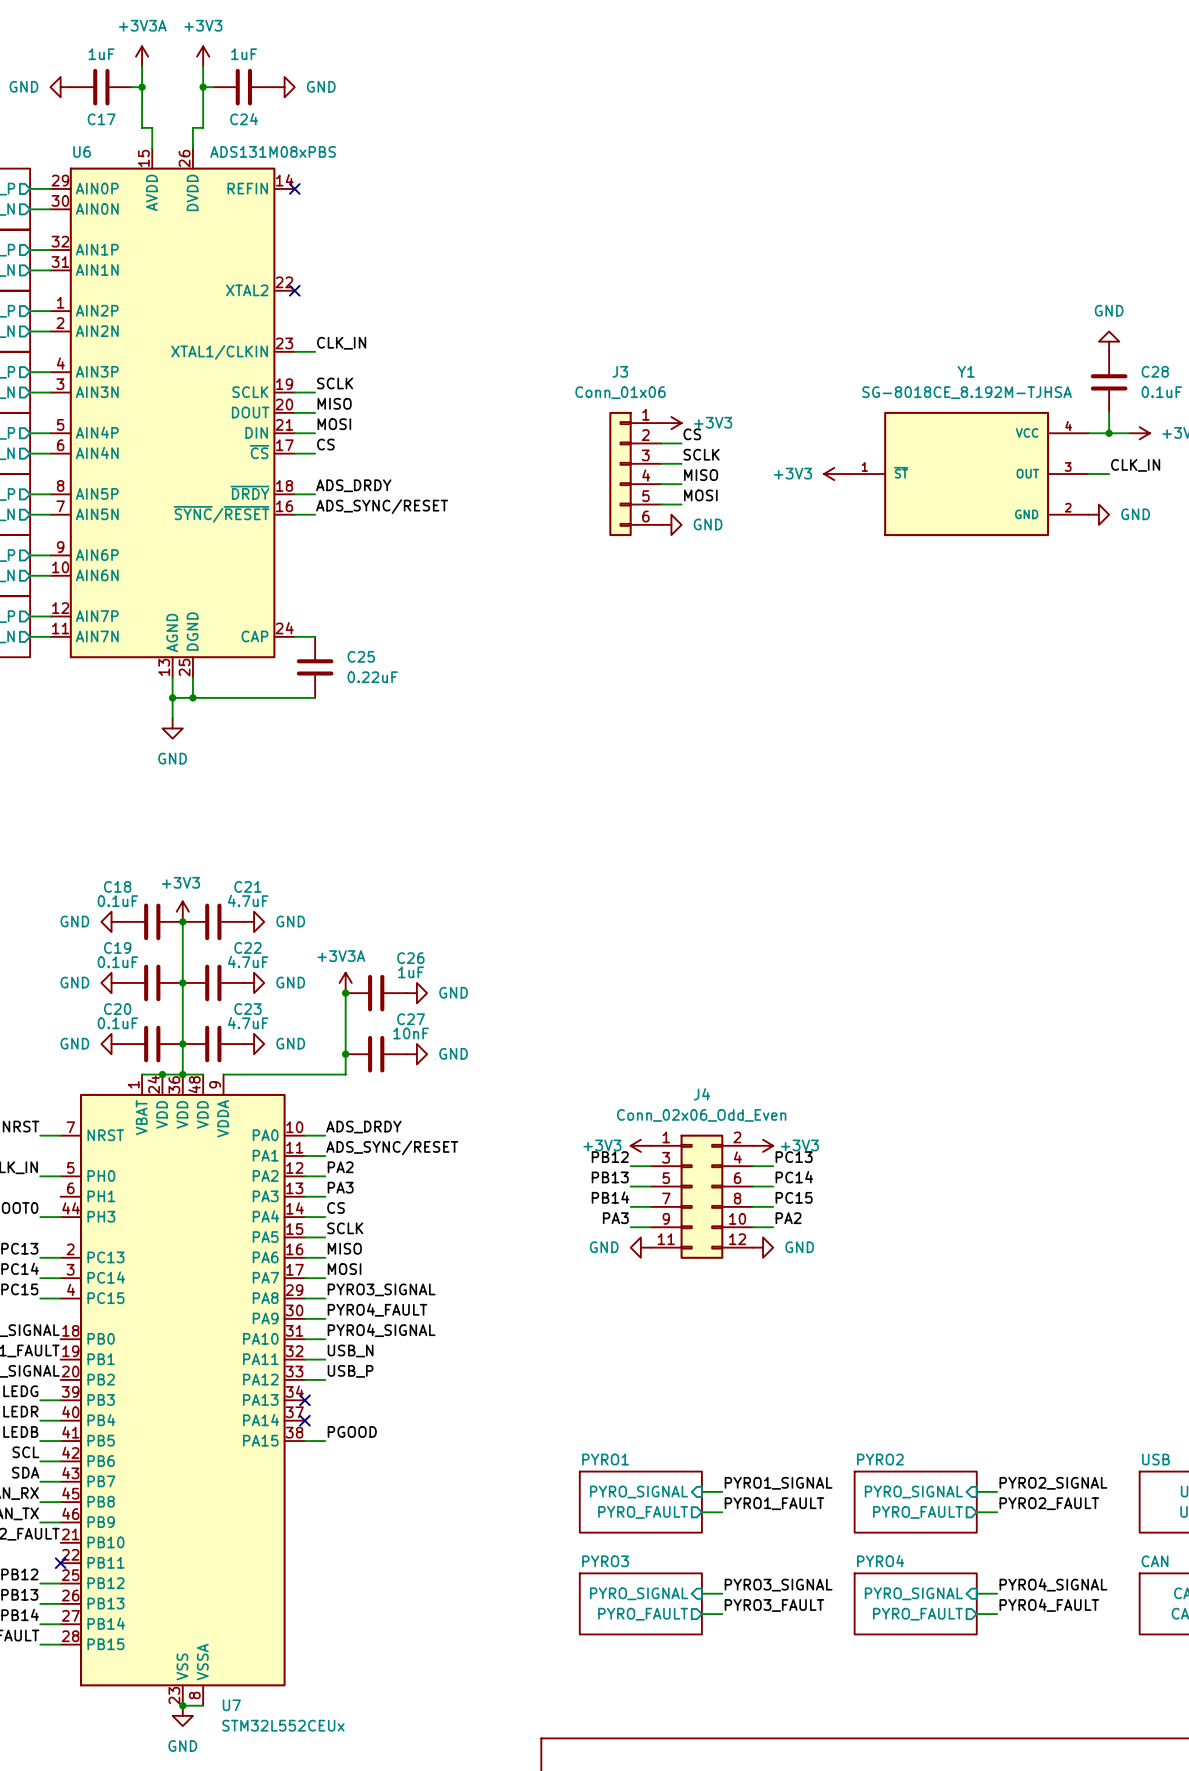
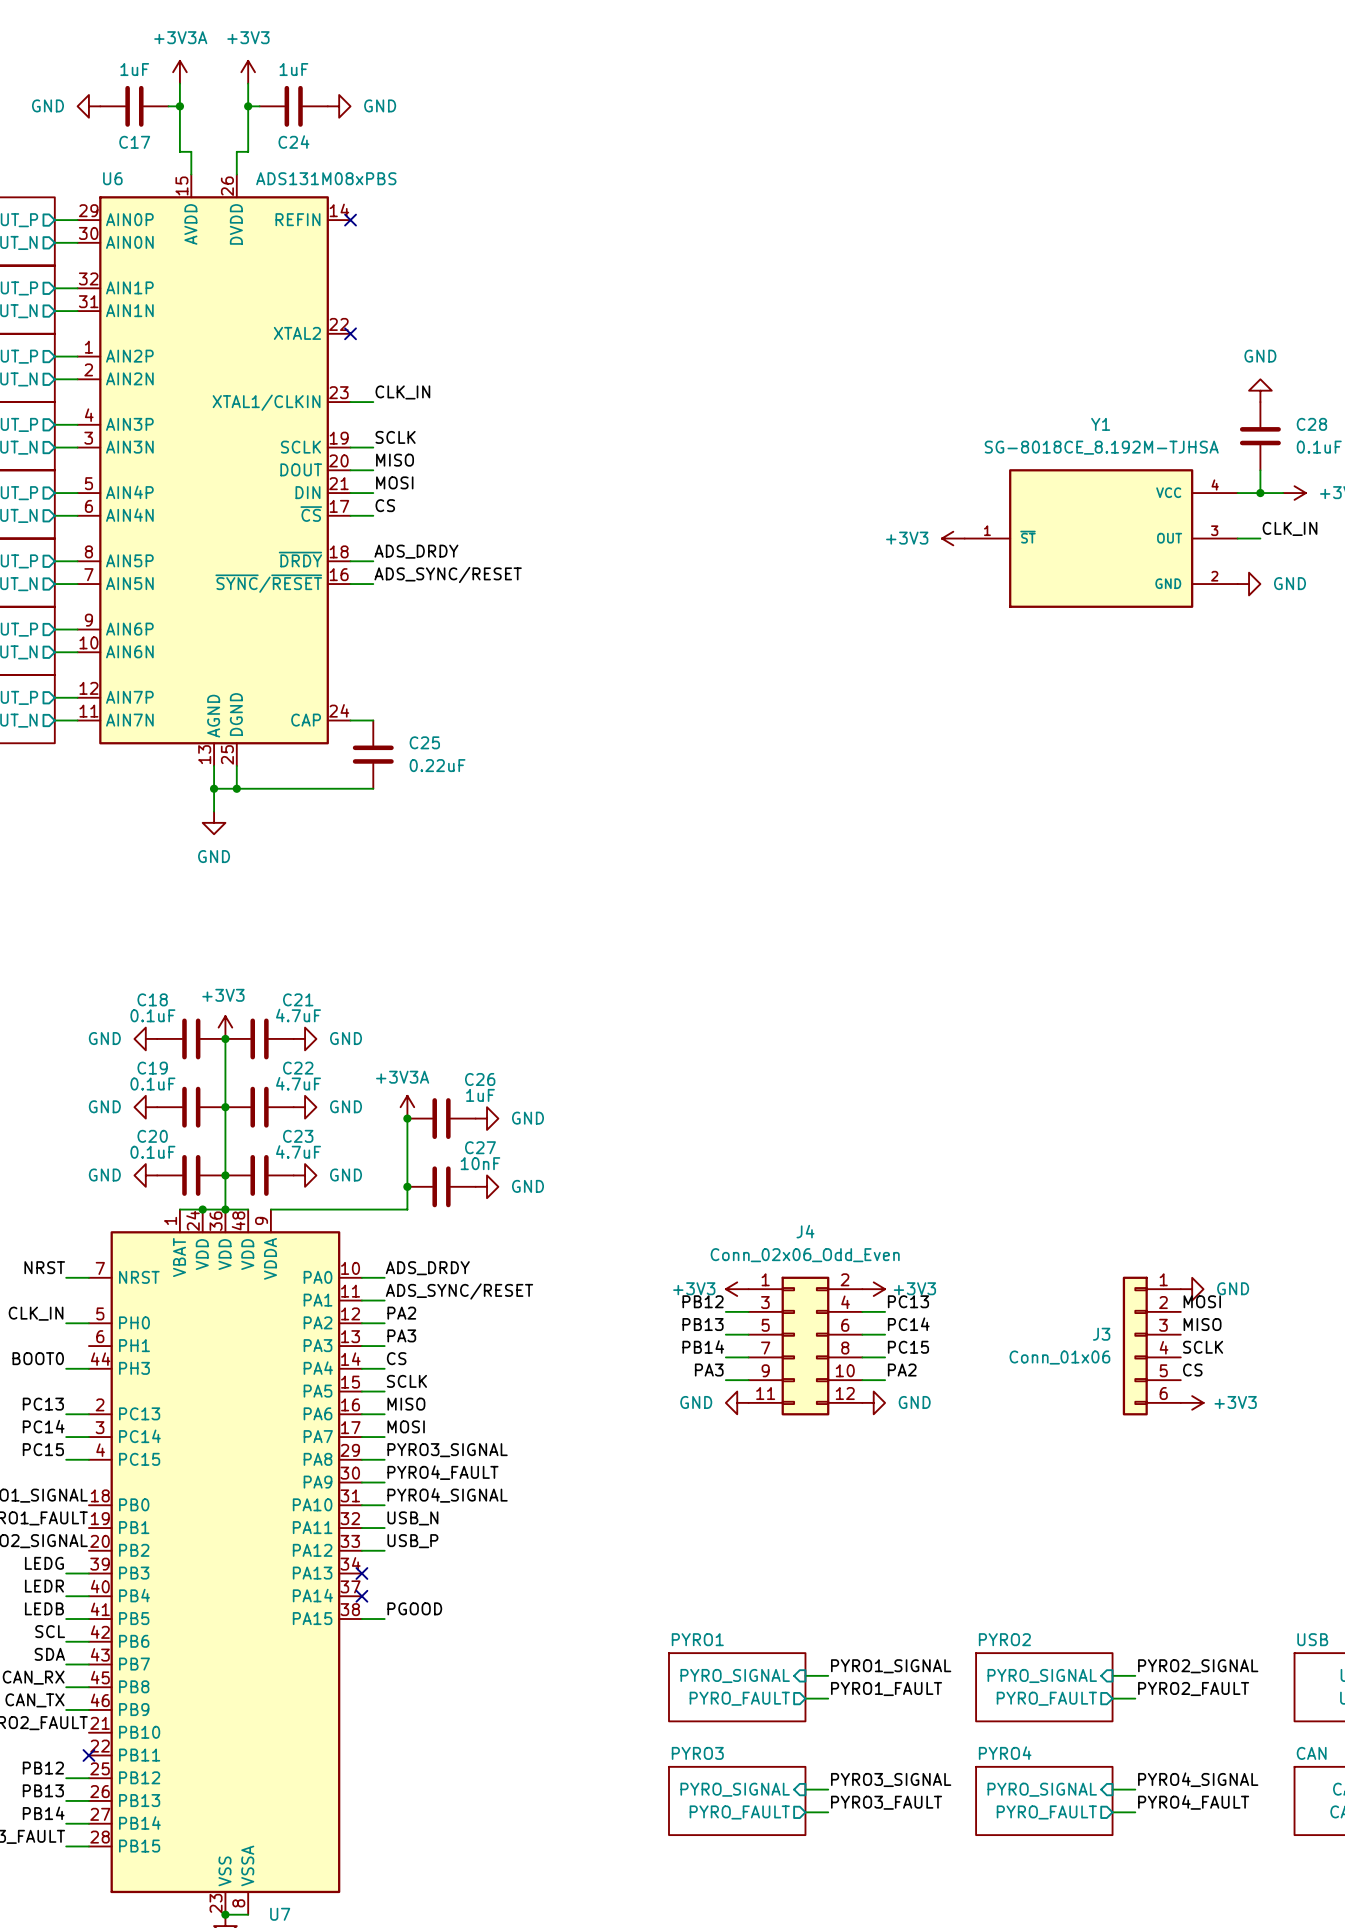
J3 name position: J3 (620, 371) -> J3 (1101, 1334)
J3 value position: Conn_01x06 (620, 392) -> Conn_01x06 (1059, 1357)
power symbol: +3V3 (671, 423) -> none
label: CS (692, 434) -> none
wire: (661, 443) (681, 443) -> none
label: SCLK (701, 454) -> none
wire: (661, 463) (681, 463) -> none
J3 position: (635, 473) -> (1151, 1346)
label: MISO (701, 475) -> none
wire: (661, 484) (681, 484) -> none
label: MOSI (700, 495) -> none
wire: (661, 504) (681, 504) -> none
power symbol: GND (671, 524) -> none
power symbol: none -> GND (1192, 1289)
label: none -> MOSI (1202, 1301)
label: none -> MISO (1202, 1324)
label: none -> SCLK (1203, 1347)
label: none -> CS (1192, 1370)
power symbol: none -> +3V3 (1192, 1402)

